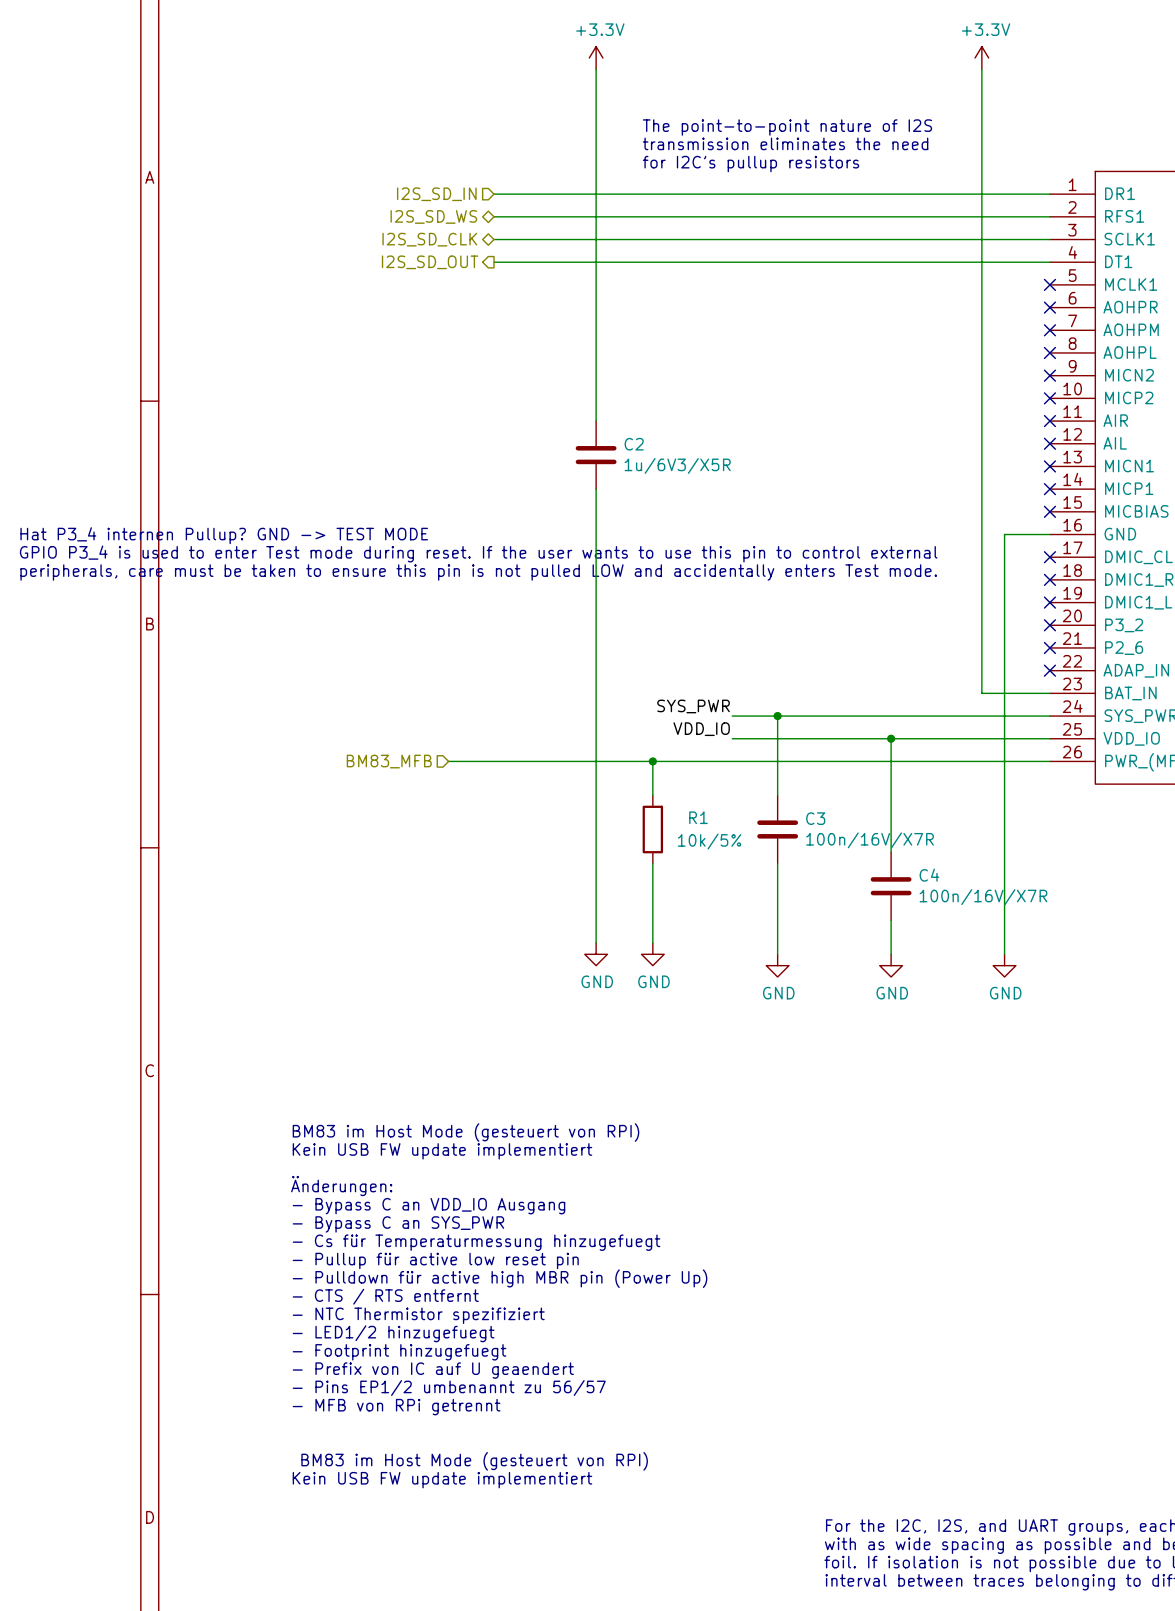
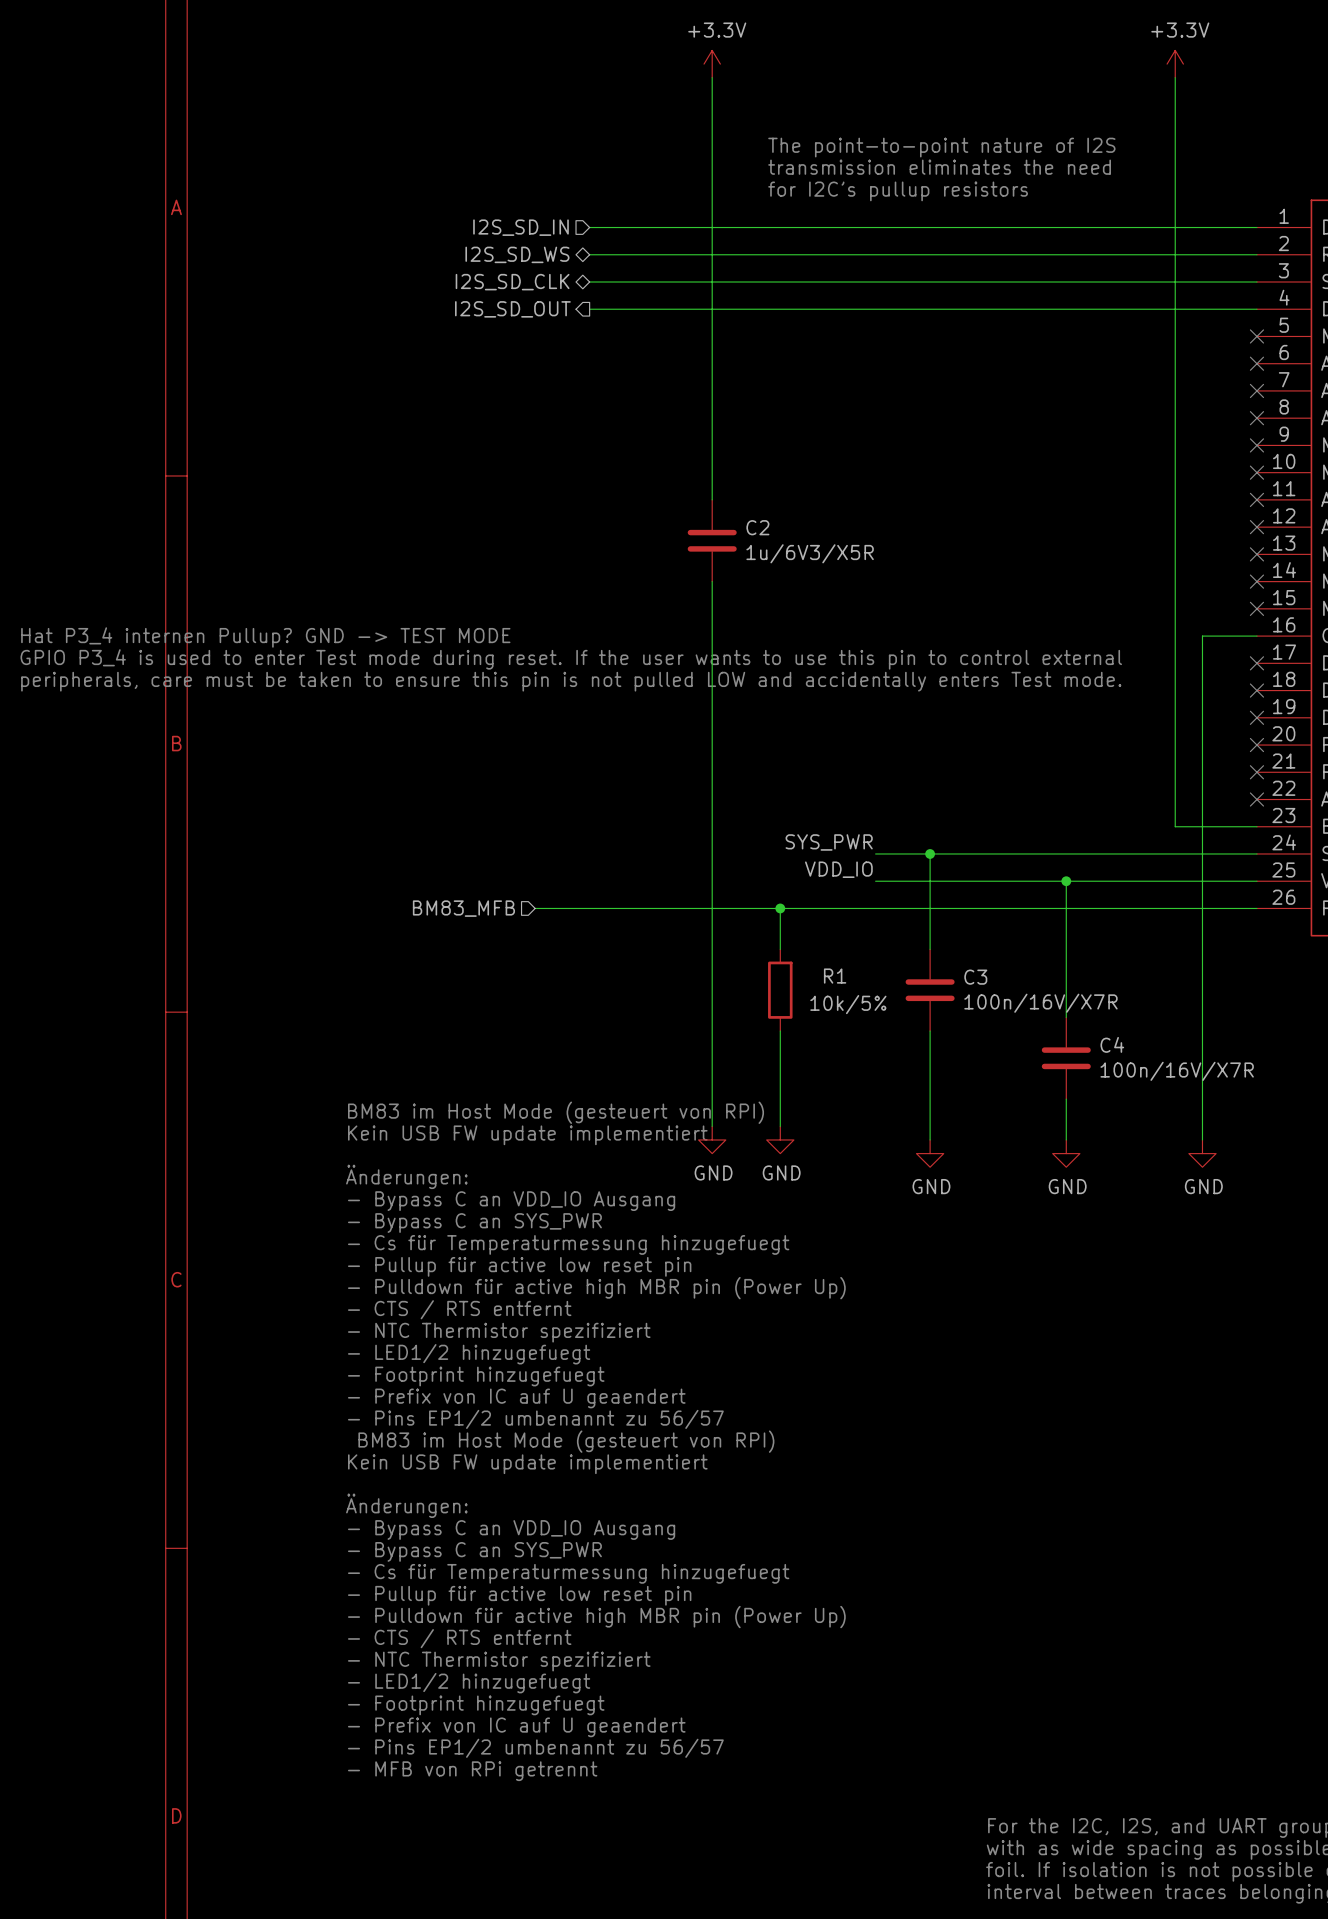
text: none -> BM83 im Host Mode (gesteuert von RPI) (556, 1112)
text: none -> Kein USB FW update implementiert (527, 1135)
text: none -> Änderungen: (406, 1176)
text: none -> - Bypass C an VDD_IO Ausgang (511, 1201)
text: none -> - Bypass C an SYS_PWR (474, 1223)
text: none -> - Pullup für active low reset pin (519, 1266)
text: none -> - Pulldown für active high MBR pin (Power Up) (596, 1288)
text: none -> - CTS / RTS entfernt (459, 1309)
text: none -> - NTC Thermistor spezifiziert (499, 1332)
text: BM83 im Host Mode (gesteuert von RPI) (465, 1132) -> - LED1/2 hinzugefuegt (469, 1354)
text: Kein USB FW update implementiert (442, 1151) -> - Footprint hinzugefuegt (476, 1376)
text: none -> - Prefix von IC auf U geaendert (516, 1398)
text: Änderungen: (341, 1186) -> - Pins EP1/2 umbenannt zu 56/57 (535, 1419)
text: - Bypass C an VDD_IO Ausgang (428, 1206) -> BM83 im Host Mode (gesteuert von RPI) (566, 1441)
text: - Bypass C an SYS_PWR (398, 1224) -> Kein USB FW update implementiert (527, 1464)
text position: - Cs für Temperaturmessung hinzugefuegt (476, 1242) -> - Cs für Temperaturmessung hinzugefuegt (568, 1244)
text: - Pullup für active low reset pin (435, 1260) -> Änderungen: (406, 1505)
text: - Pulldown für active high MBR pin (Power Up) (500, 1278) -> - Bypass C an VDD_IO Ausgang (511, 1529)
text: - CTS / RTS entfernt (385, 1296) -> - Bypass C an SYS_PWR (474, 1551)
text: - NTC Thermistor spezifiziert (418, 1315) -> - Cs für Temperaturmessung hinzugefuegt (568, 1573)
text: - LED1/2 hinzugefuegt (393, 1333) -> - Pullup für active low reset pin (519, 1595)
text: - Footprint hinzugefuegt (399, 1352) -> - Pulldown für active high MBR pin (Power Up) (596, 1617)
text: - Prefix von IC auf U geaendert (433, 1370) -> - CTS / RTS entfernt (459, 1638)
text: - Pins EP1/2 umbenannt zu 56/57 (449, 1388) -> - NTC Thermistor spezifiziert (499, 1661)
text: - MFB von RPi getrennt (396, 1407) -> - LED1/2 hinzugefuegt (469, 1683)
text: none -> - Footprint hinzugefuegt (476, 1705)
text: none -> - Prefix von IC auf U geaendert (516, 1727)
text: BM83 im Host Mode (gesteuert von RPI) (474, 1461) -> - Pins EP1/2 umbenannt zu 56/57 (535, 1748)
text: Kein USB FW update implementiert (442, 1480) -> - MFB von RPi getrennt (472, 1771)

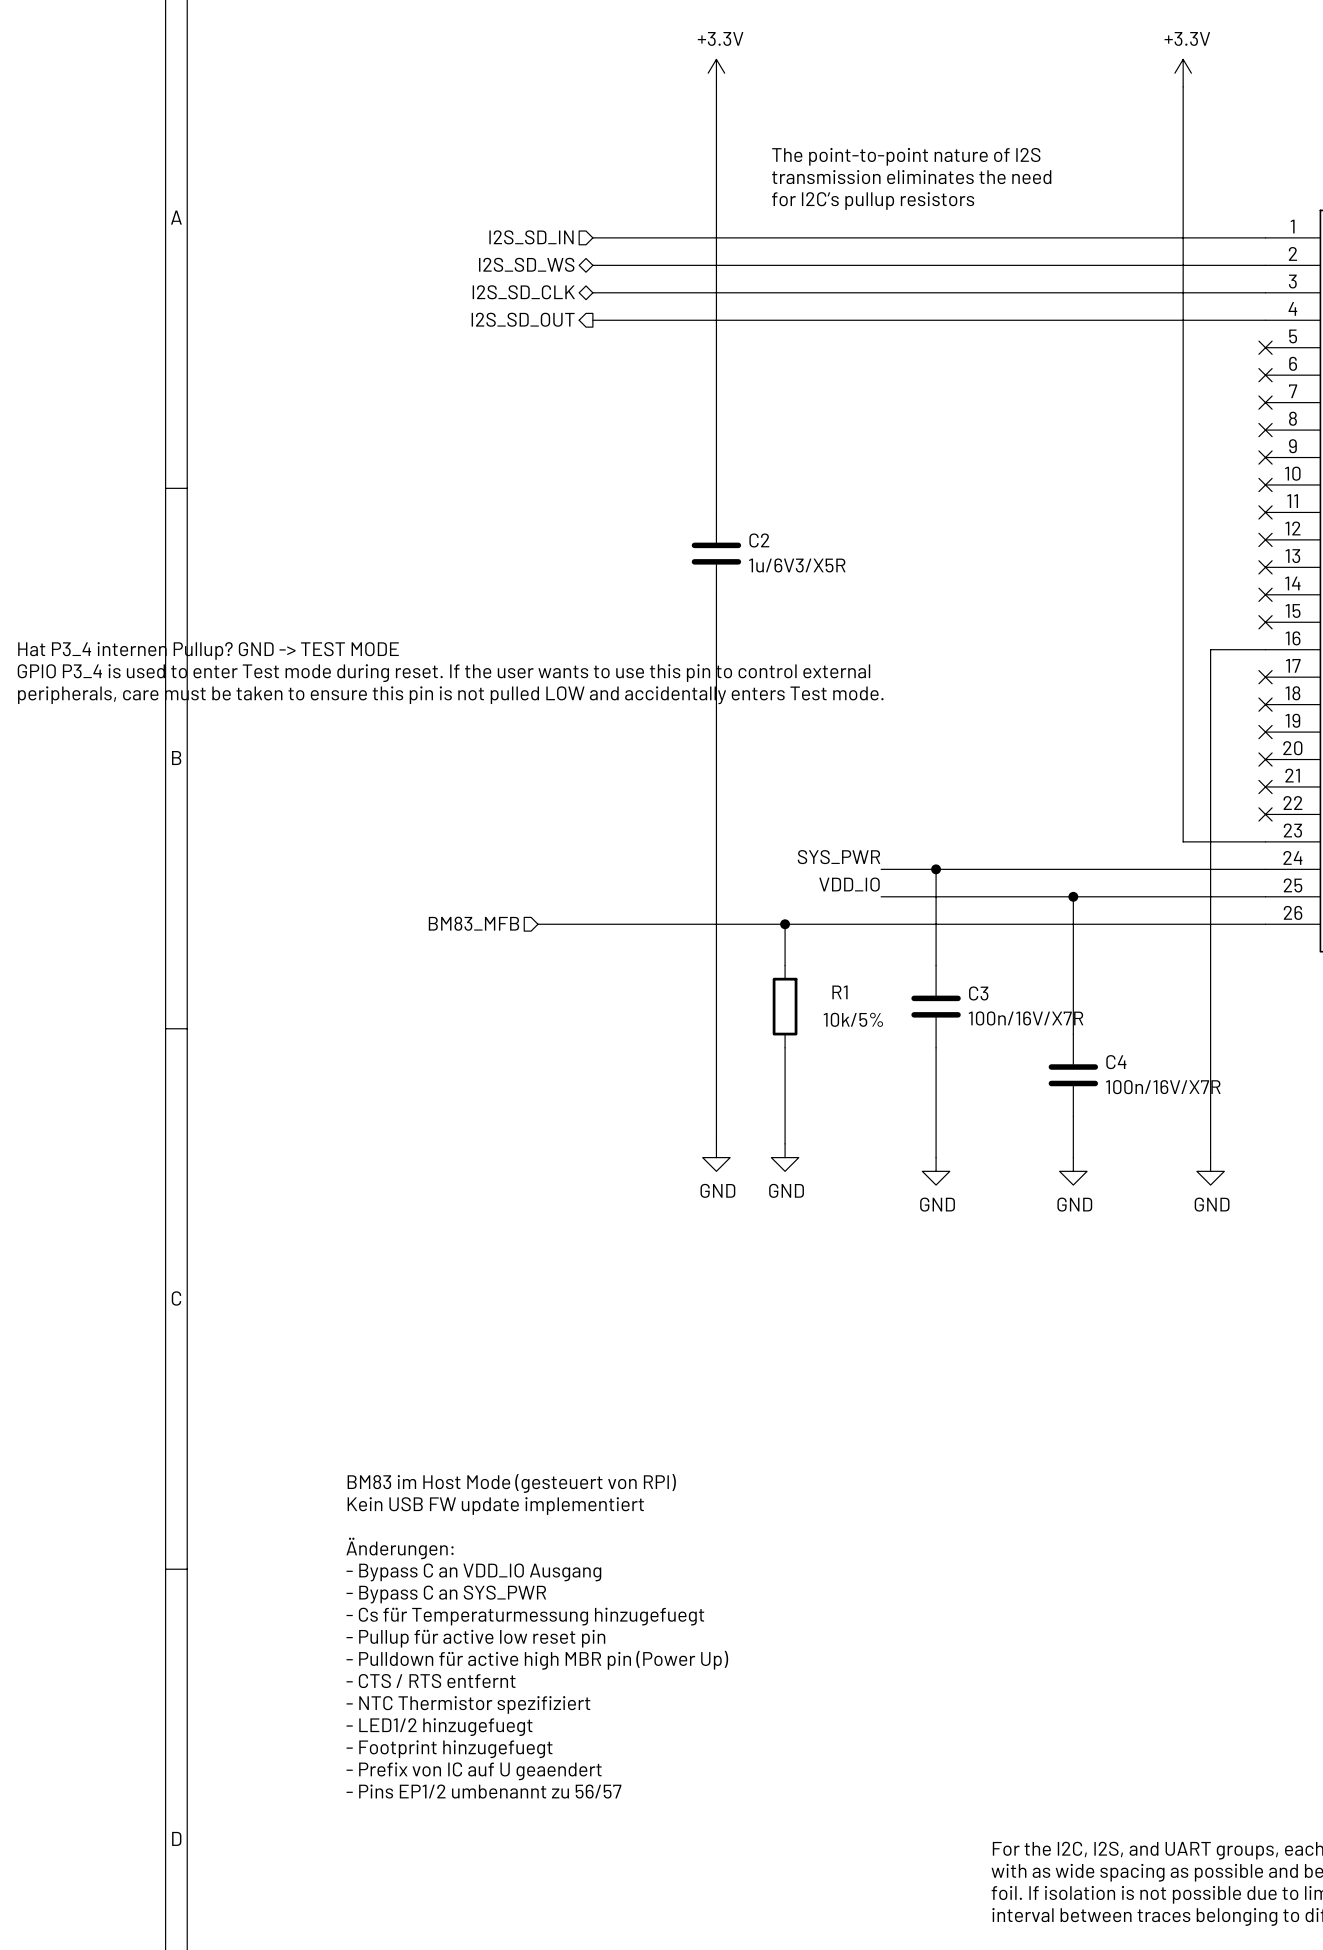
text: BM83 im Host Mode (gesteuert von RPI) (556, 1112) -> none
text: Kein USB FW update implementiert (527, 1135) -> none
text: Änderungen: (406, 1176) -> none
text: - Bypass C an VDD_IO Ausgang (511, 1201) -> none
text: - Bypass C an SYS_PWR (474, 1223) -> none
text: - Cs für Temperaturmessung hinzugefuegt (568, 1244) -> none
text: - Pullup für active low reset pin (519, 1266) -> none
text: - Pulldown für active high MBR pin (Power Up) (596, 1288) -> none
text: - CTS / RTS entfernt (459, 1309) -> none
text: - NTC Thermistor spezifiziert (499, 1332) -> none
text: - LED1/2 hinzugefuegt (469, 1354) -> none
text: - Footprint hinzugefuegt (476, 1376) -> none
text: - Prefix von IC auf U geaendert (516, 1398) -> none
text: - Pins EP1/2 umbenannt zu 56/57 (535, 1419) -> none
text: BM83 im Host Mode (gesteuert von RPI) (566, 1441) -> none
text: Kein USB FW update implementiert (527, 1464) -> BM83 im Host Mode (gesteuert von RPI) (511, 1483)
text: none -> Kein USB FW update implementiert (495, 1506)
text: Änderungen: (406, 1505) -> none
text: - Bypass C an VDD_IO Ausgang (511, 1529) -> Änderungen: (400, 1548)
text: - Bypass C an SYS_PWR (474, 1551) -> - Bypass C an VDD_IO Ausgang (473, 1572)
text: - Cs für Temperaturmessung hinzugefuegt (568, 1573) -> - Bypass C an SYS_PWR (446, 1594)
text: - Pullup für active low reset pin (519, 1595) -> - Cs für Temperaturmessung hinzugefuegt (525, 1616)
text: - Pulldown für active high MBR pin (Power Up) (596, 1617) -> - Pullup für active low reset pin (475, 1638)
text: - CTS / RTS entfernt (459, 1638) -> - Pulldown für active high MBR pin (Power Up) (537, 1660)
text: - NTC Thermistor spezifiziert (499, 1661) -> - CTS / RTS entfernt (431, 1681)
text: - LED1/2 hinzugefuegt (469, 1683) -> - NTC Thermistor spezifiziert (468, 1704)
text: - Footprint hinzugefuegt (476, 1705) -> - LED1/2 hinzugefuegt (439, 1727)
text: - Prefix von IC auf U geaendert (516, 1727) -> - Footprint hinzugefuegt (449, 1749)
text: - Pins EP1/2 umbenannt zu 56/57 (535, 1748) -> - Prefix von IC auf U geaendert (474, 1771)
text: - MFB von RPi getrennt (472, 1771) -> - Pins EP1/2 umbenannt zu 56/57 (483, 1791)

